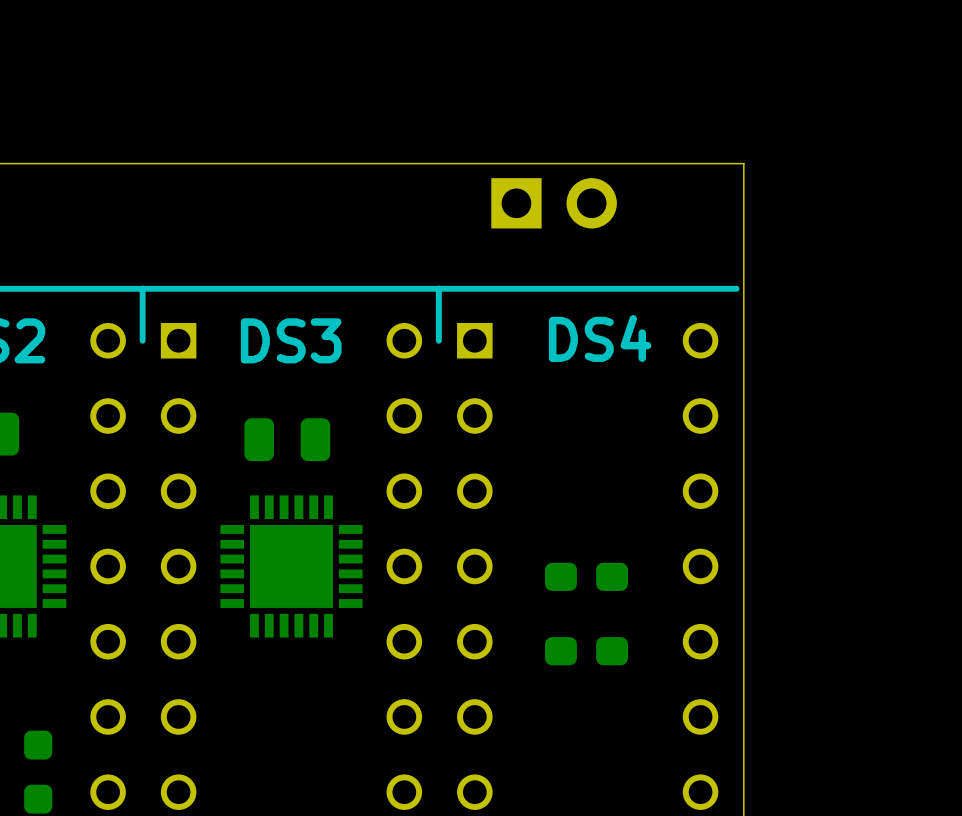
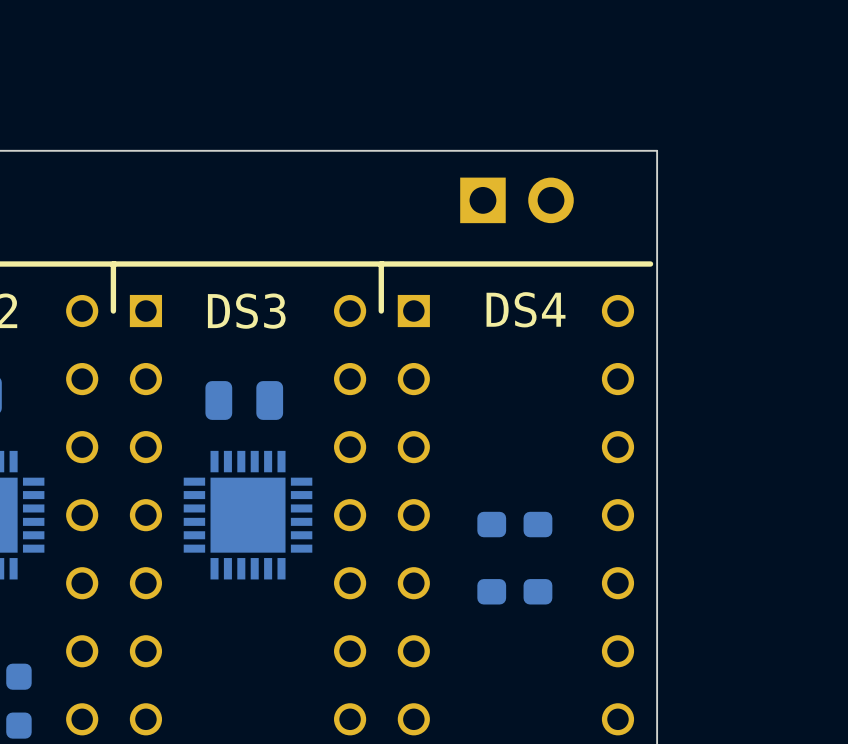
part position: (554, 203) -> (516, 200)

